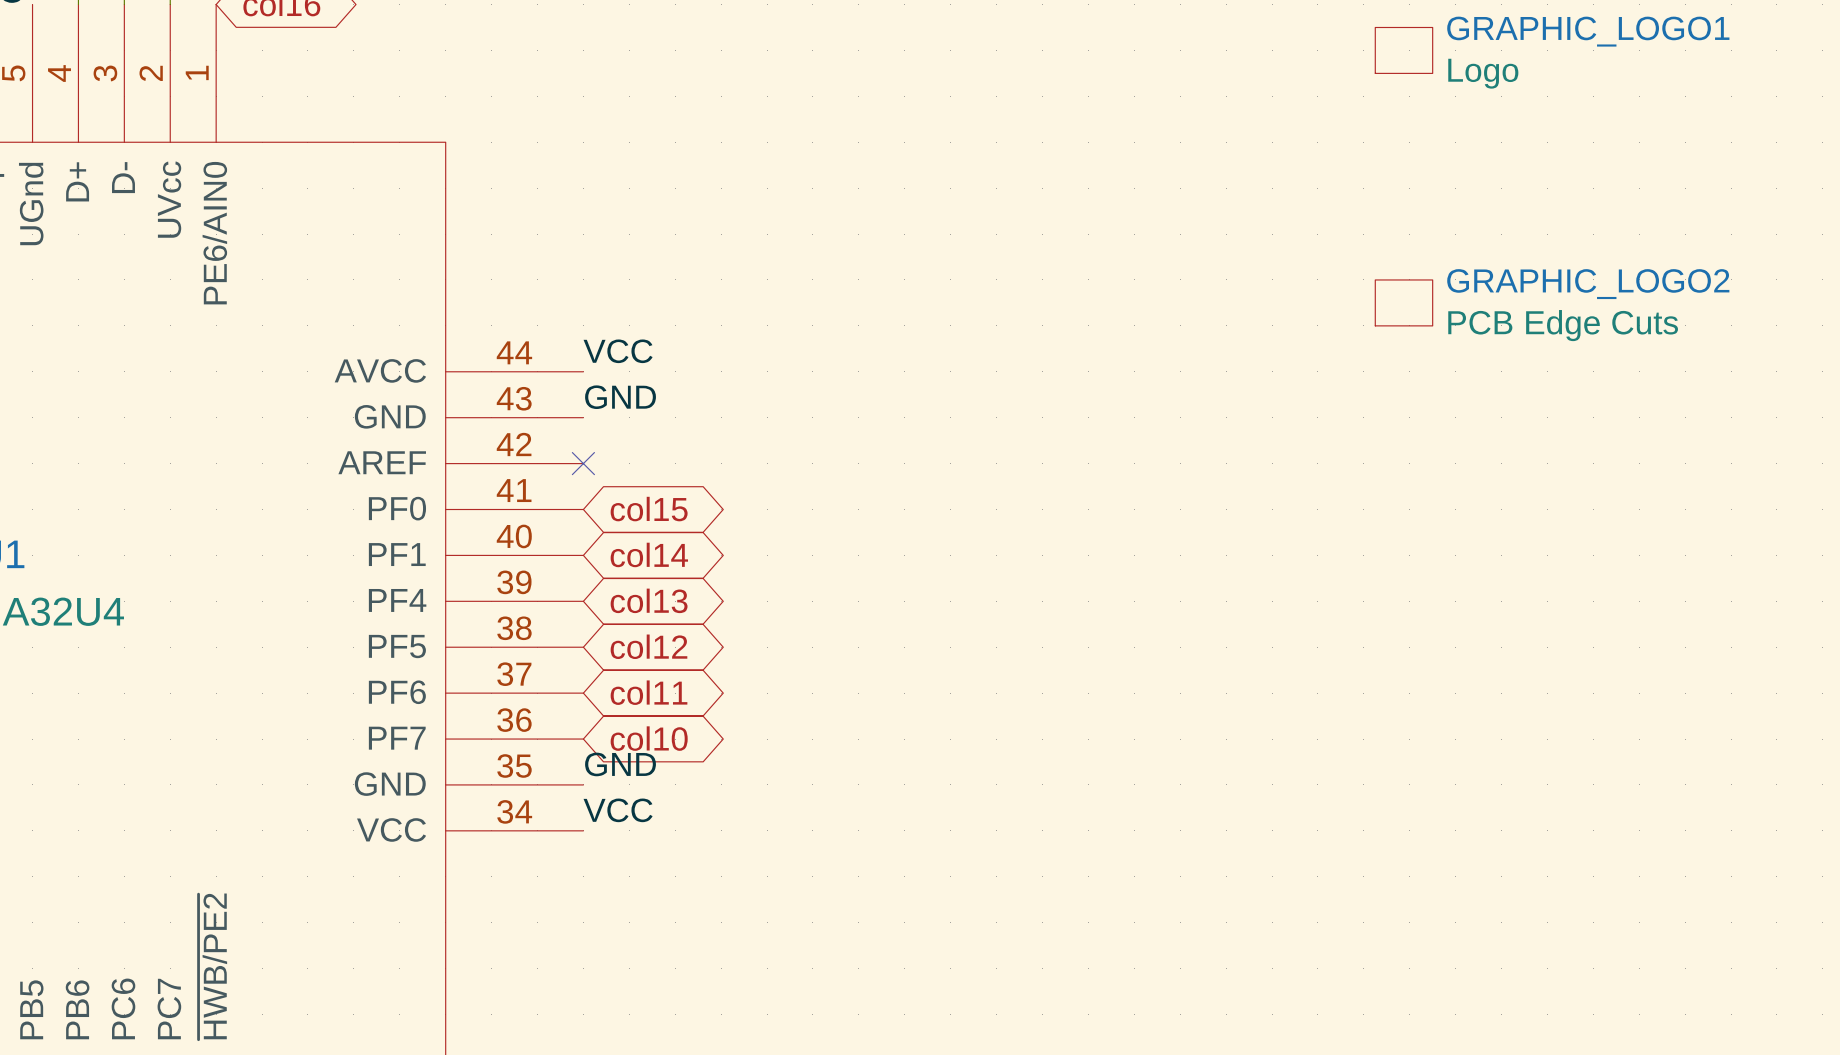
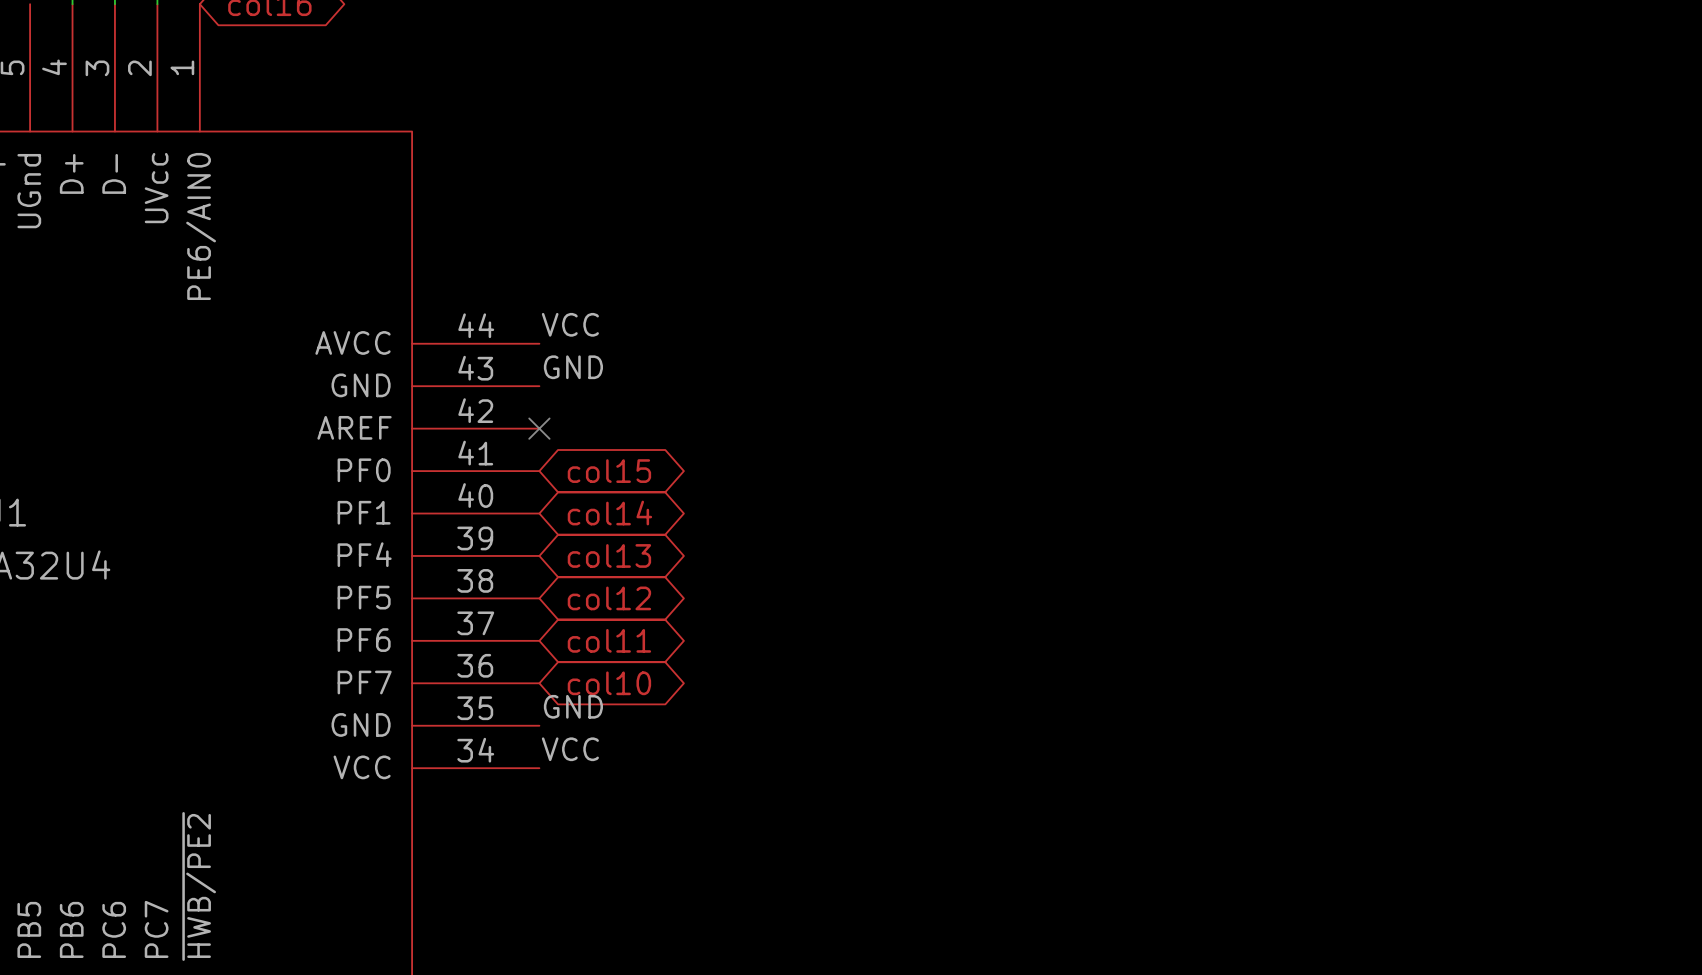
GRAPHIC_LOGO1: Logo (1403, 50) -> none
GRAPHIC_LOGO2: PCB Edge Cuts (1403, 302) -> none

